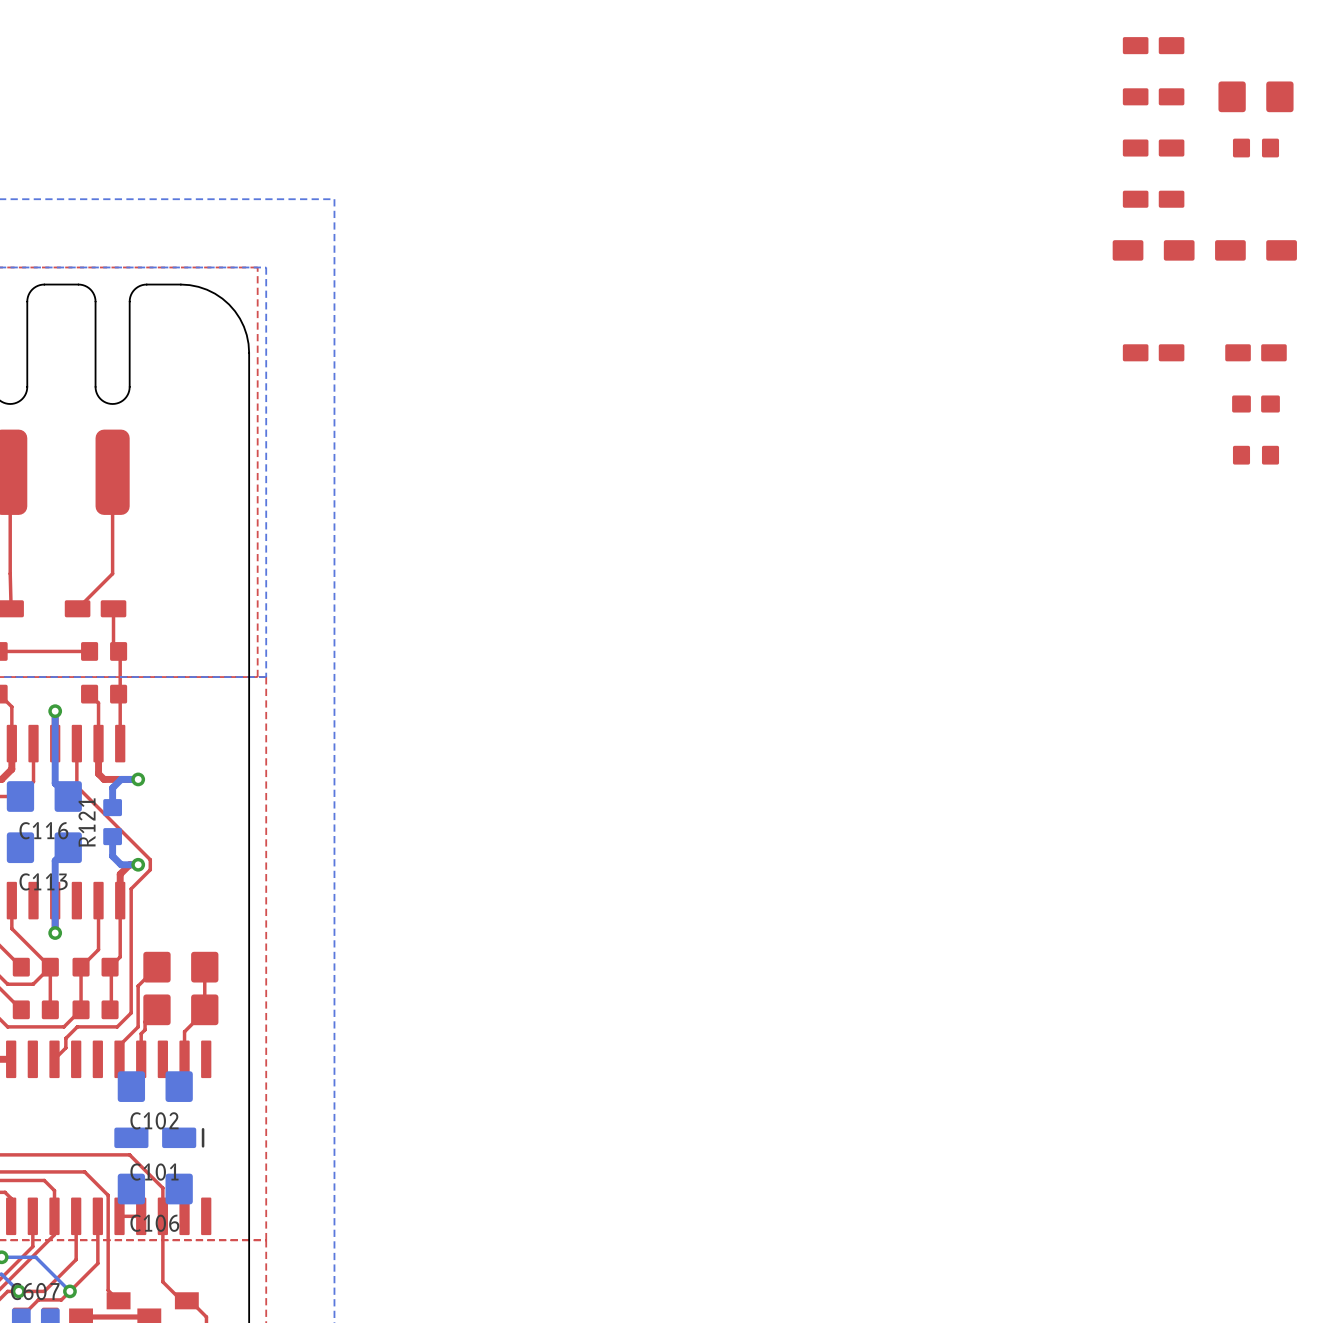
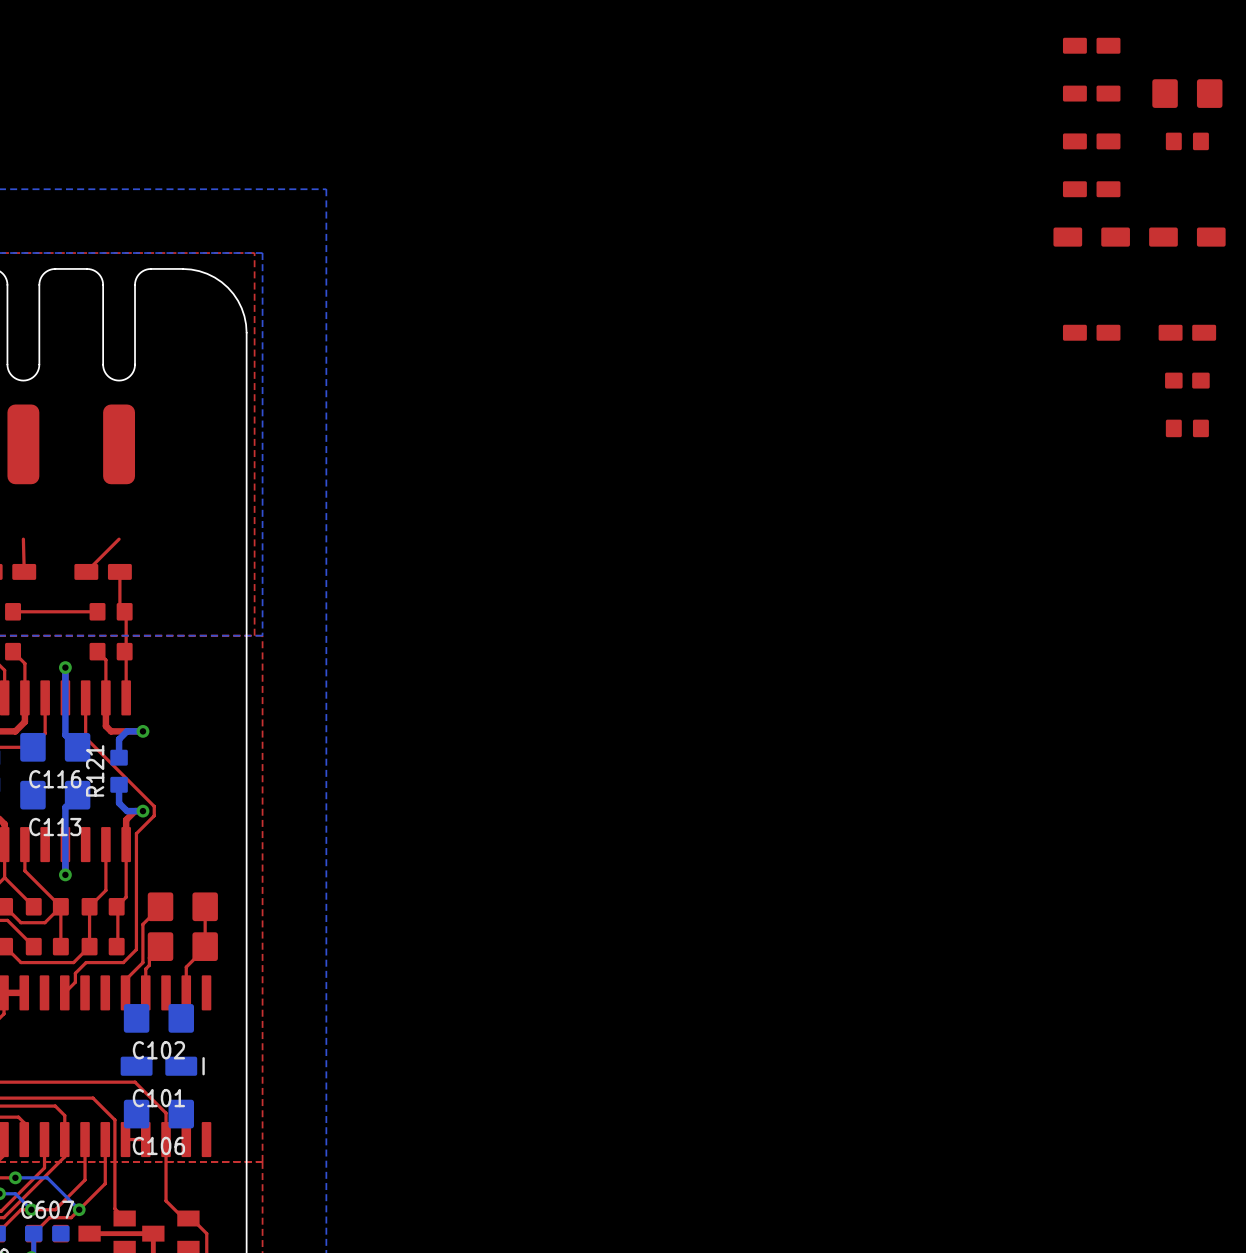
top track: (10, 472) (10, 573) -> none
top track: (112, 472) (112, 573) -> none

